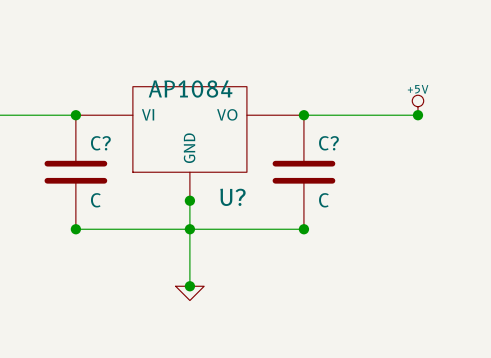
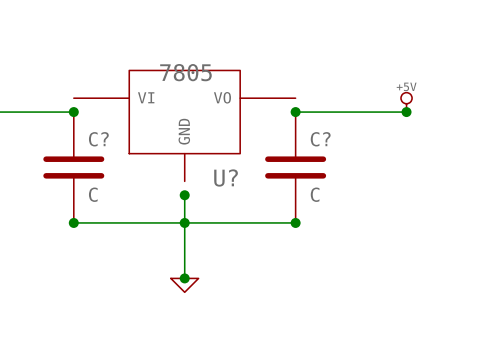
U?: none -> 7805 (184, 125)
U?: AP1084 (189, 143) -> none

